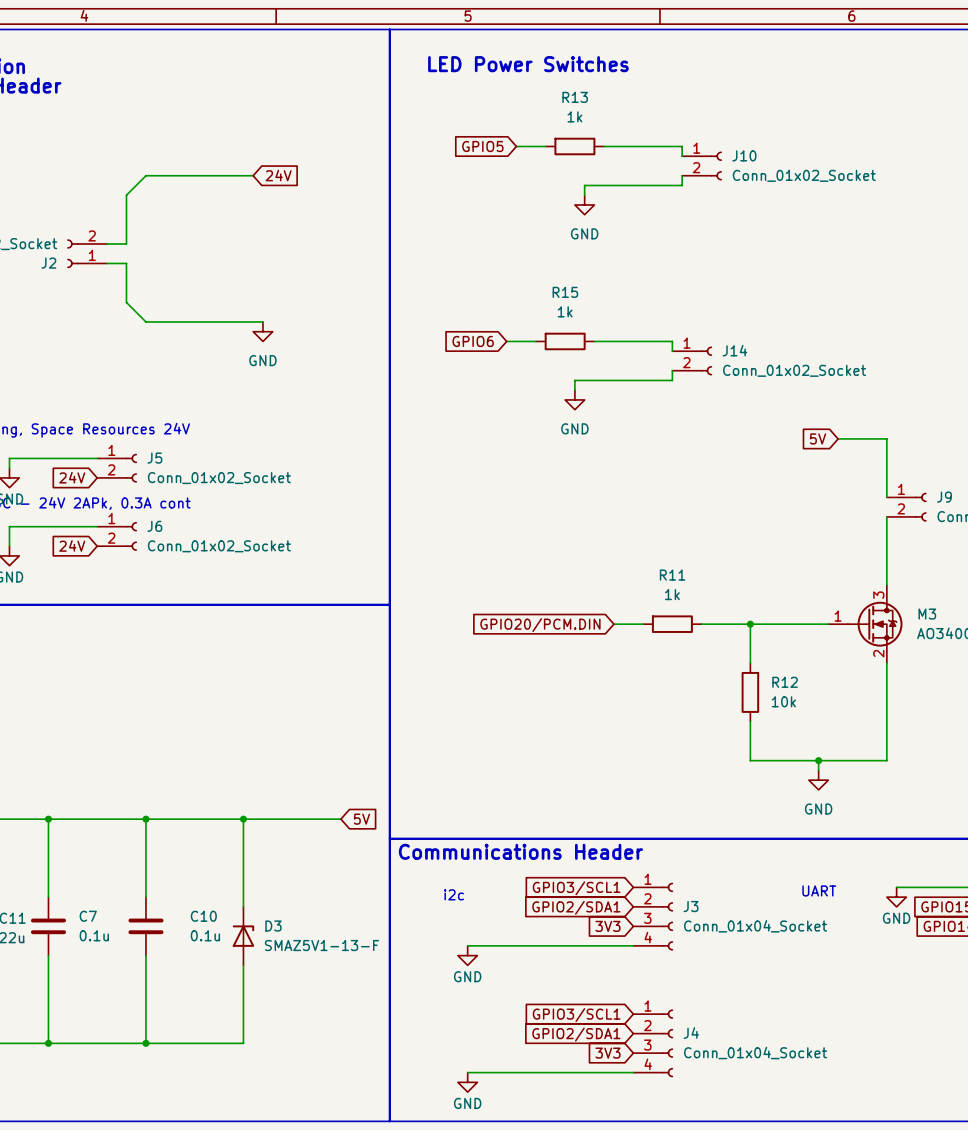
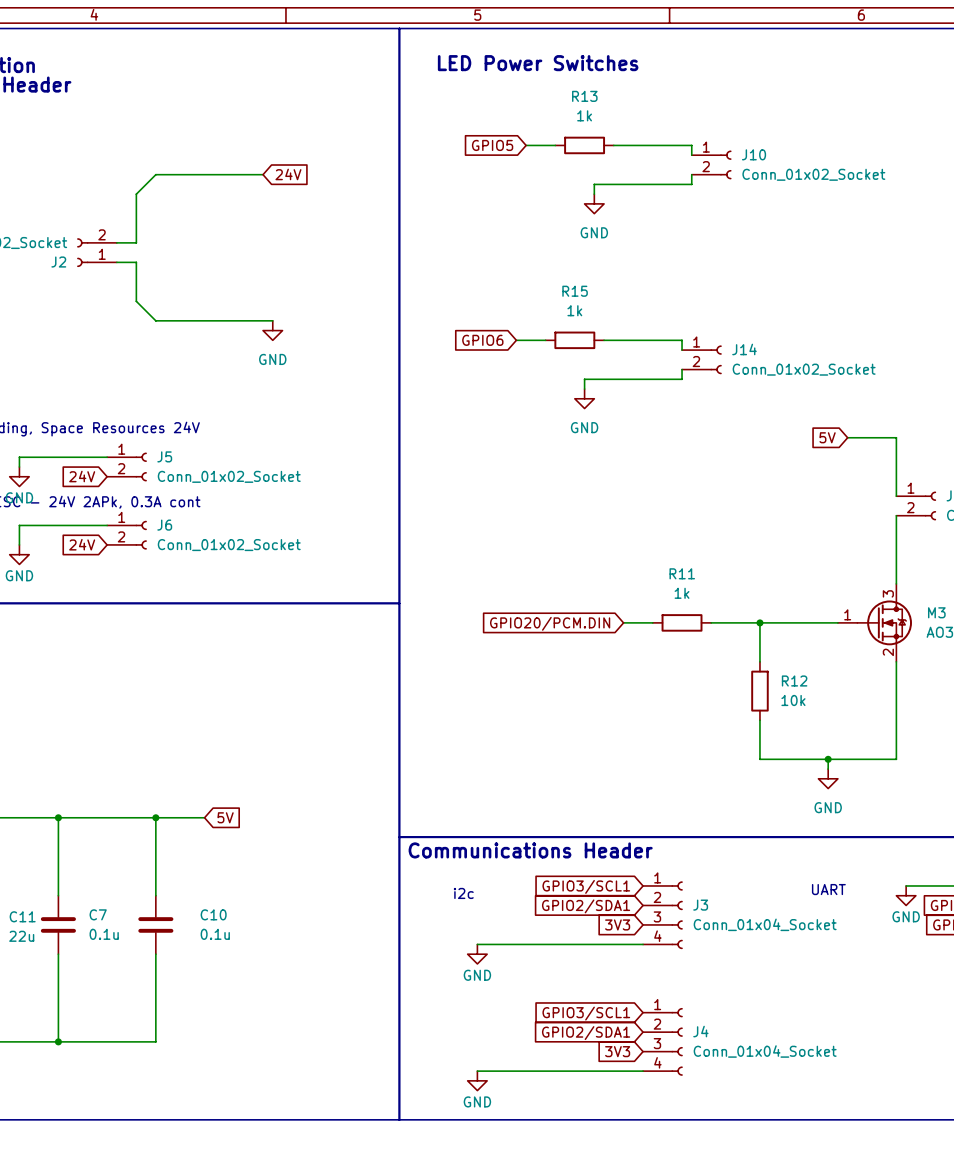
wire: (194, 819) (340, 819) -> none
wire: (243, 819) (243, 906) -> none
junction: (243, 819) -> none
global label position: 5V (361, 819) -> 5V (225, 817)
D3: SMAZ5V1-13-F (243, 936) -> none
wire: (243, 965) (243, 1043) (145, 1043) -> none
junction: (145, 1043) -> none

